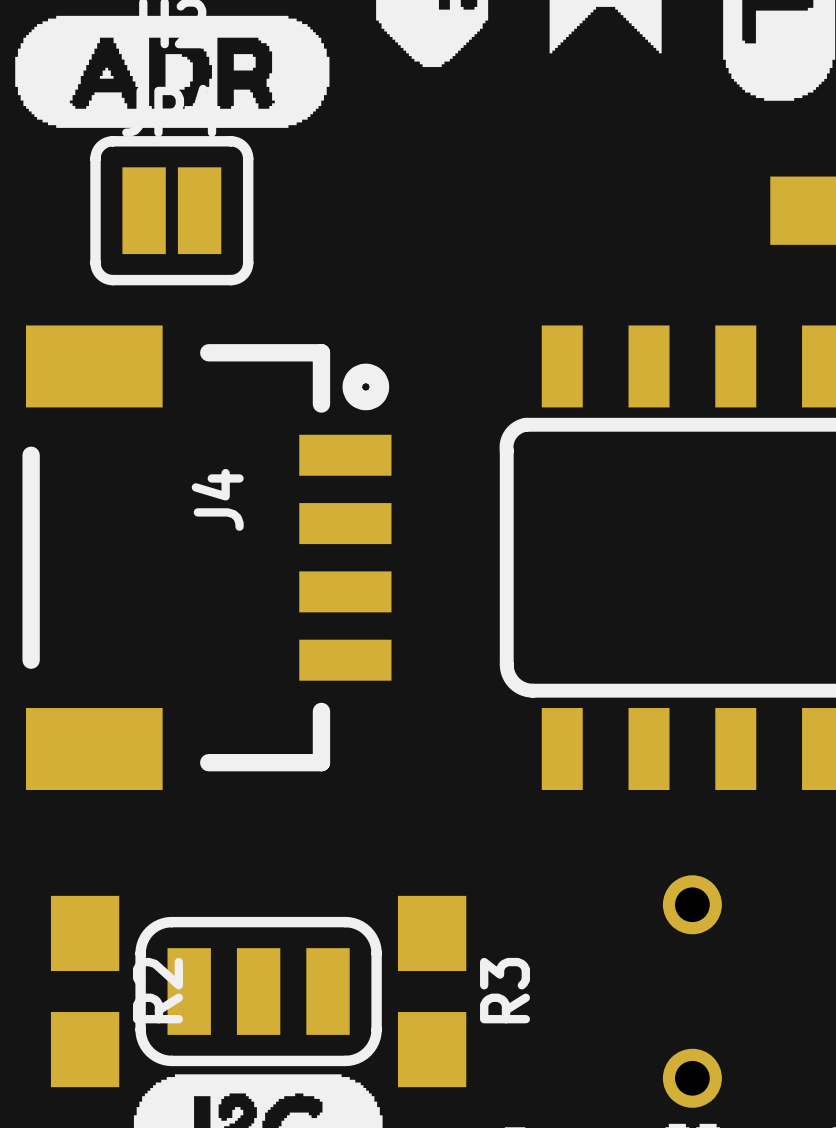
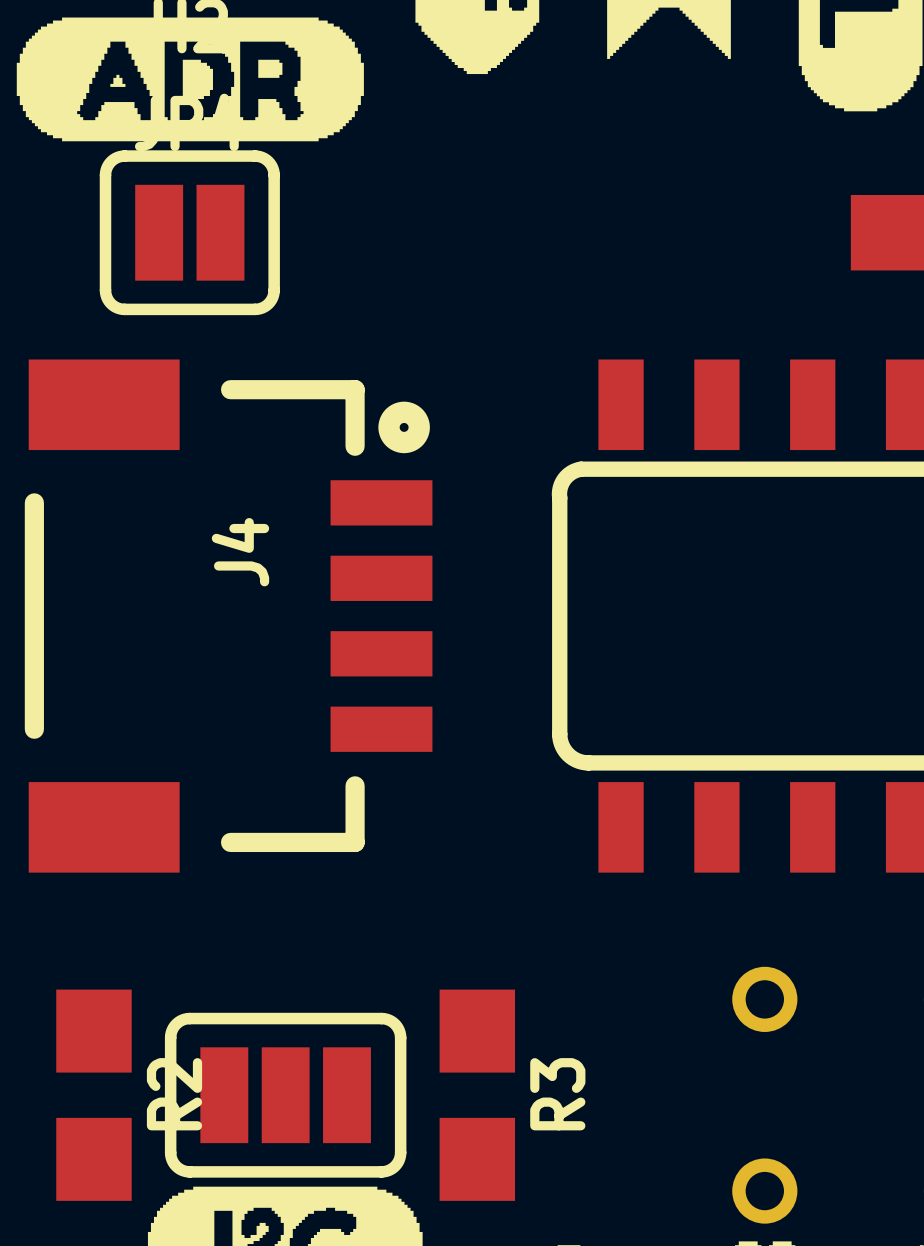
part footprint: [135, 916, 382, 1067] -> [164, 1012, 407, 1178]

